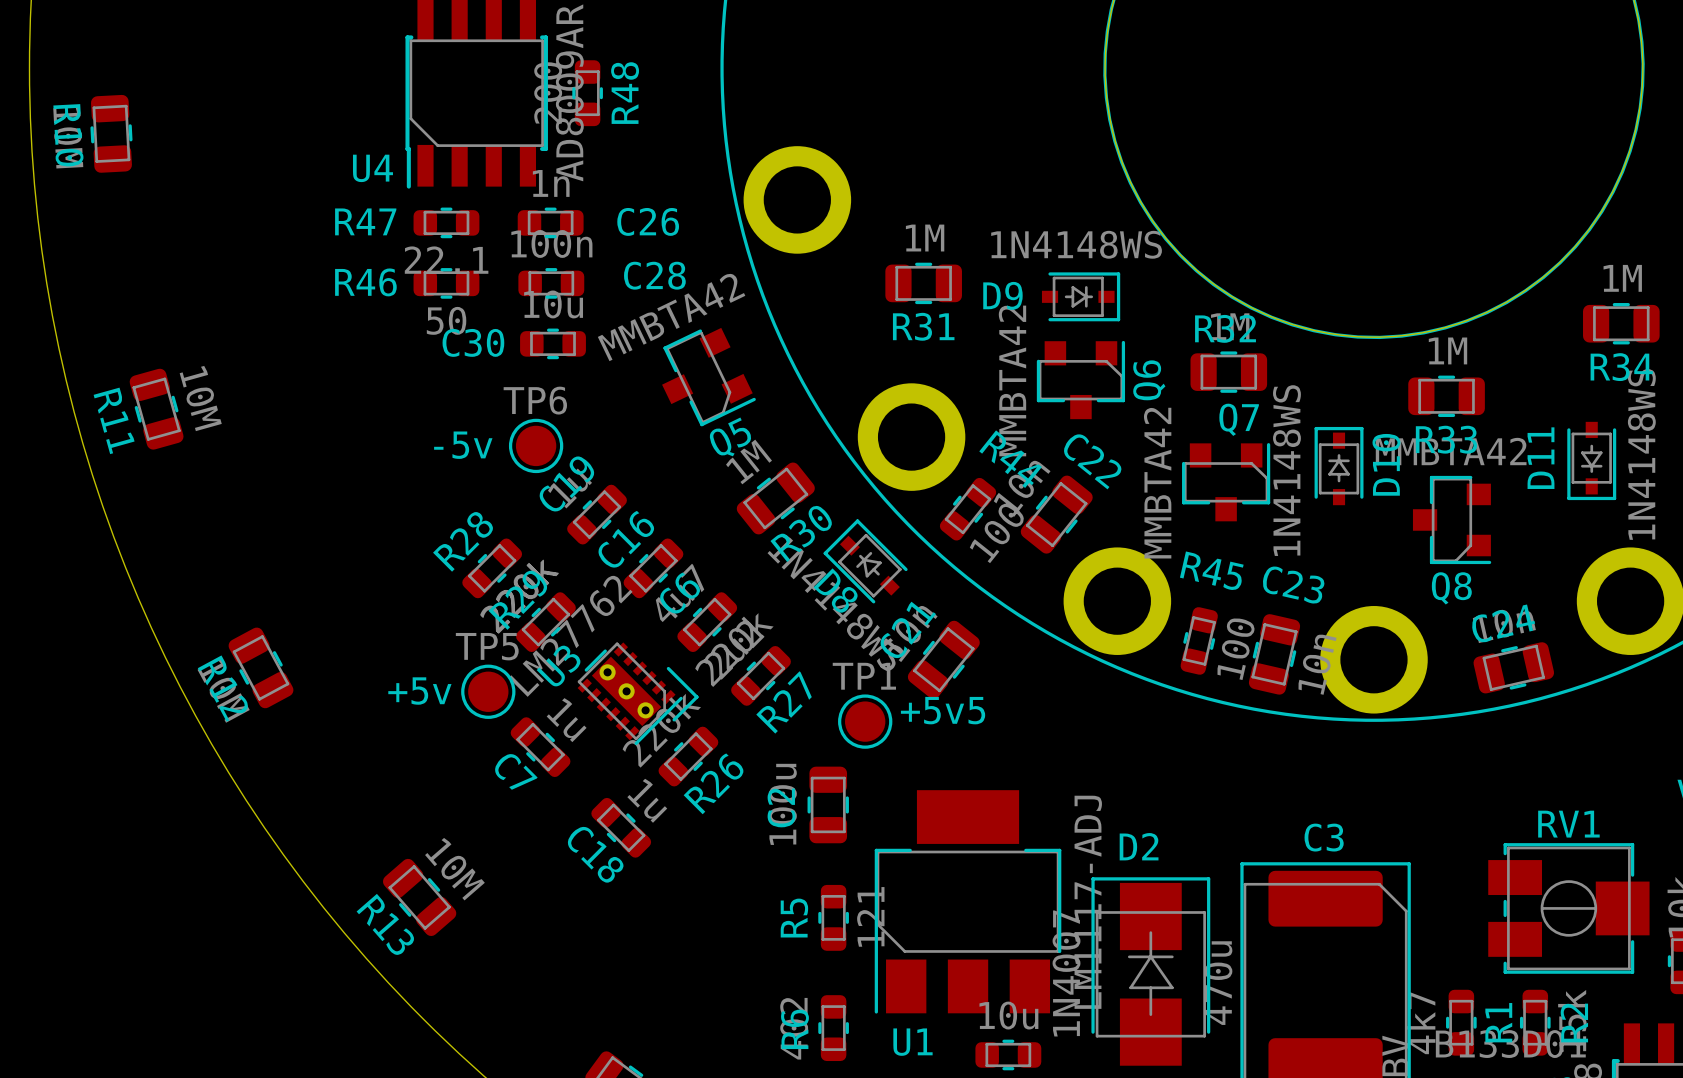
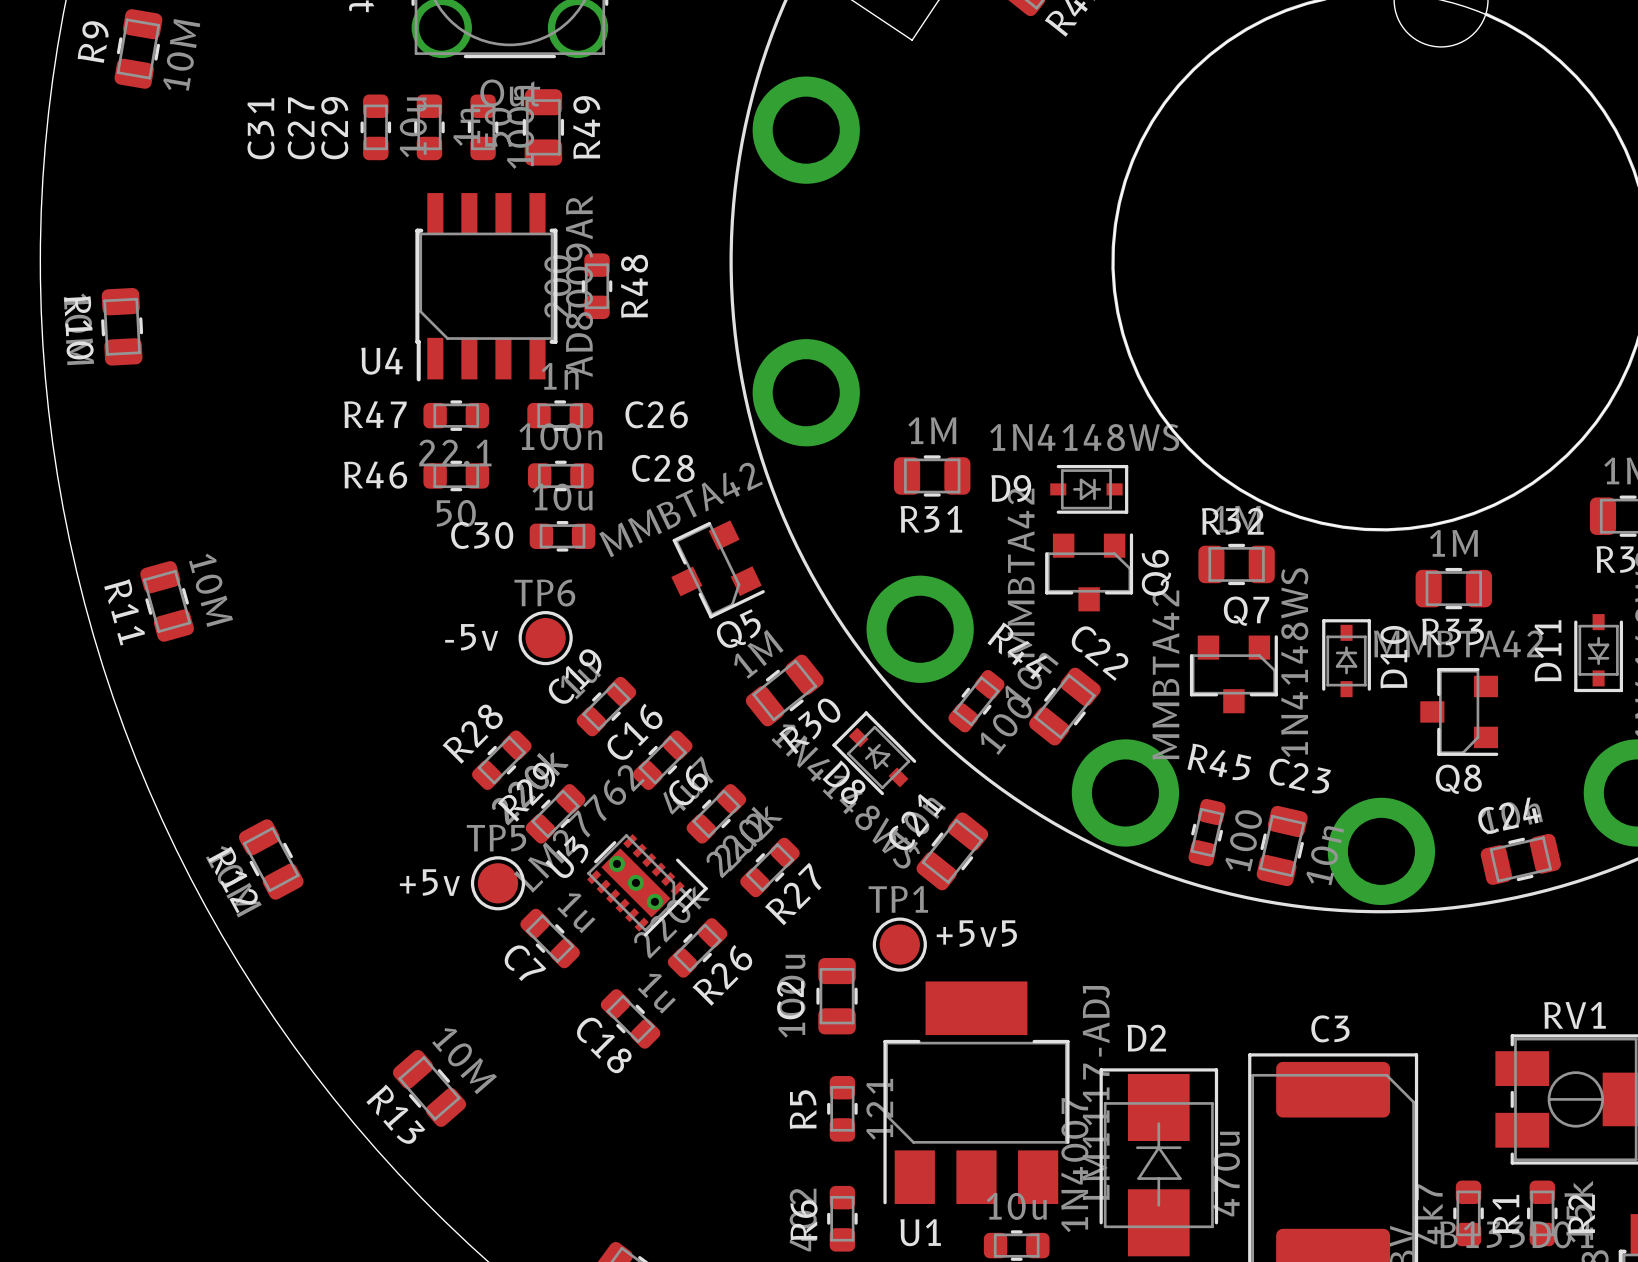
TP1 position: (865, 721) -> (899, 944)

